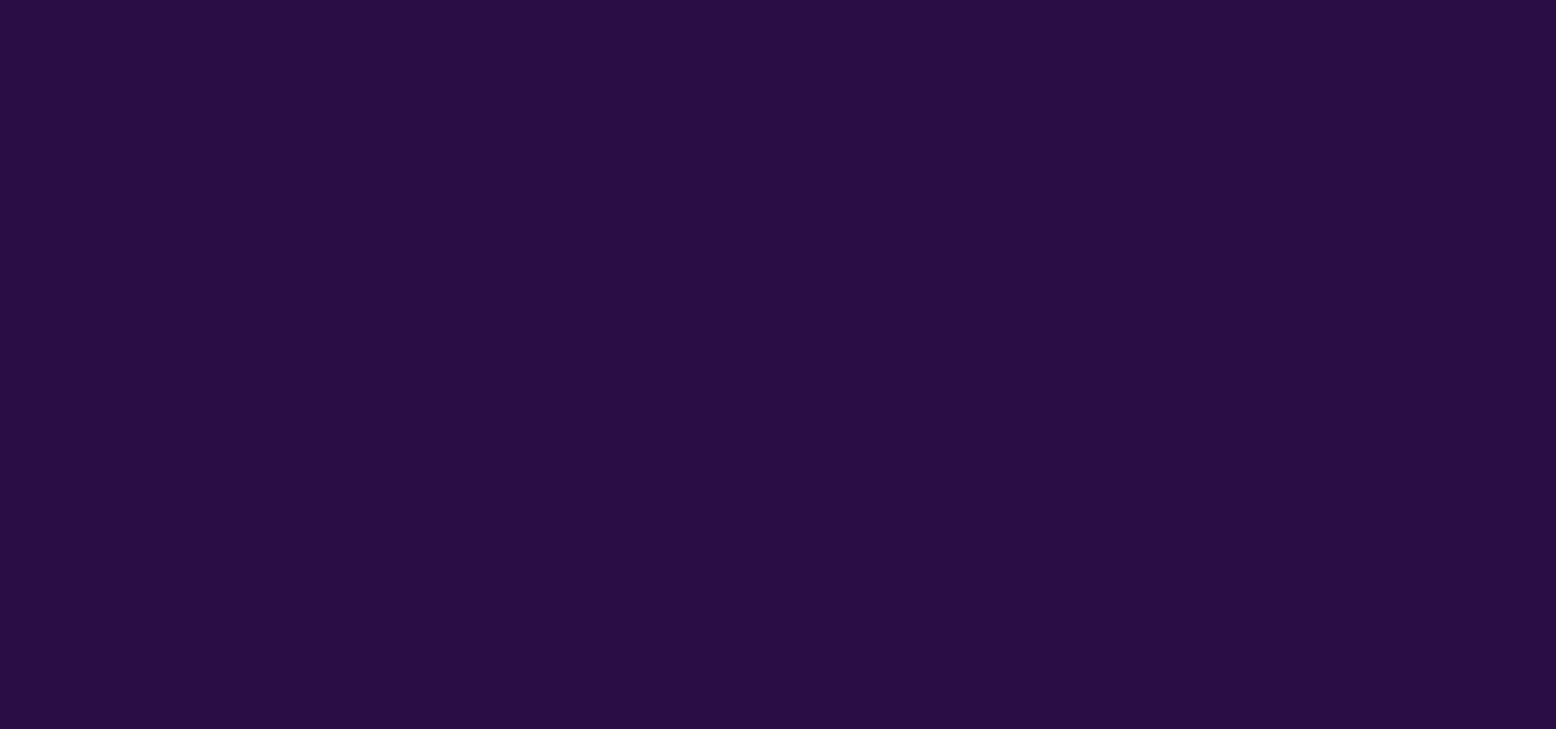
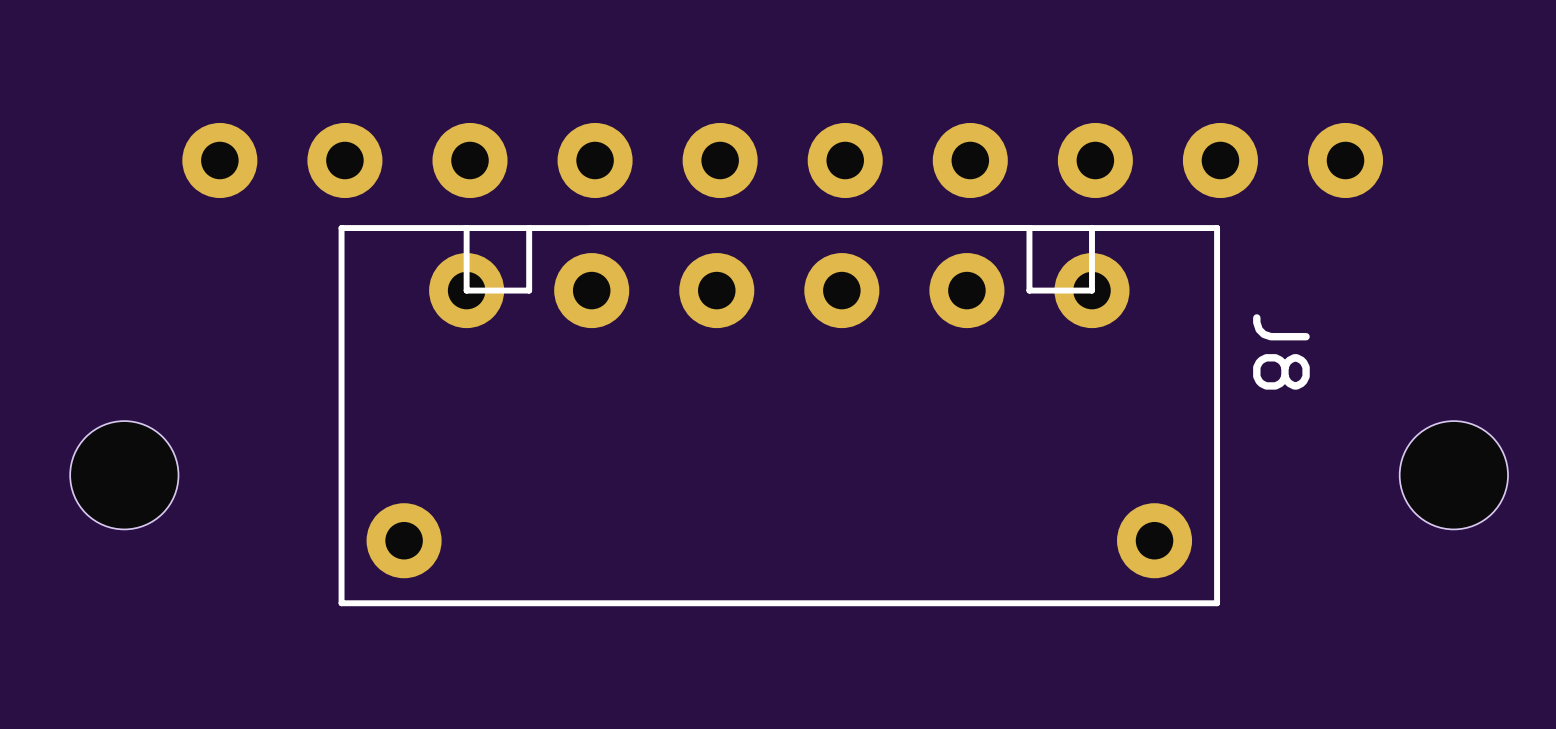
part: none -> (782, 160)
J8: none -> (779, 415)
part: none -> (124, 475)
part: none -> (1453, 475)

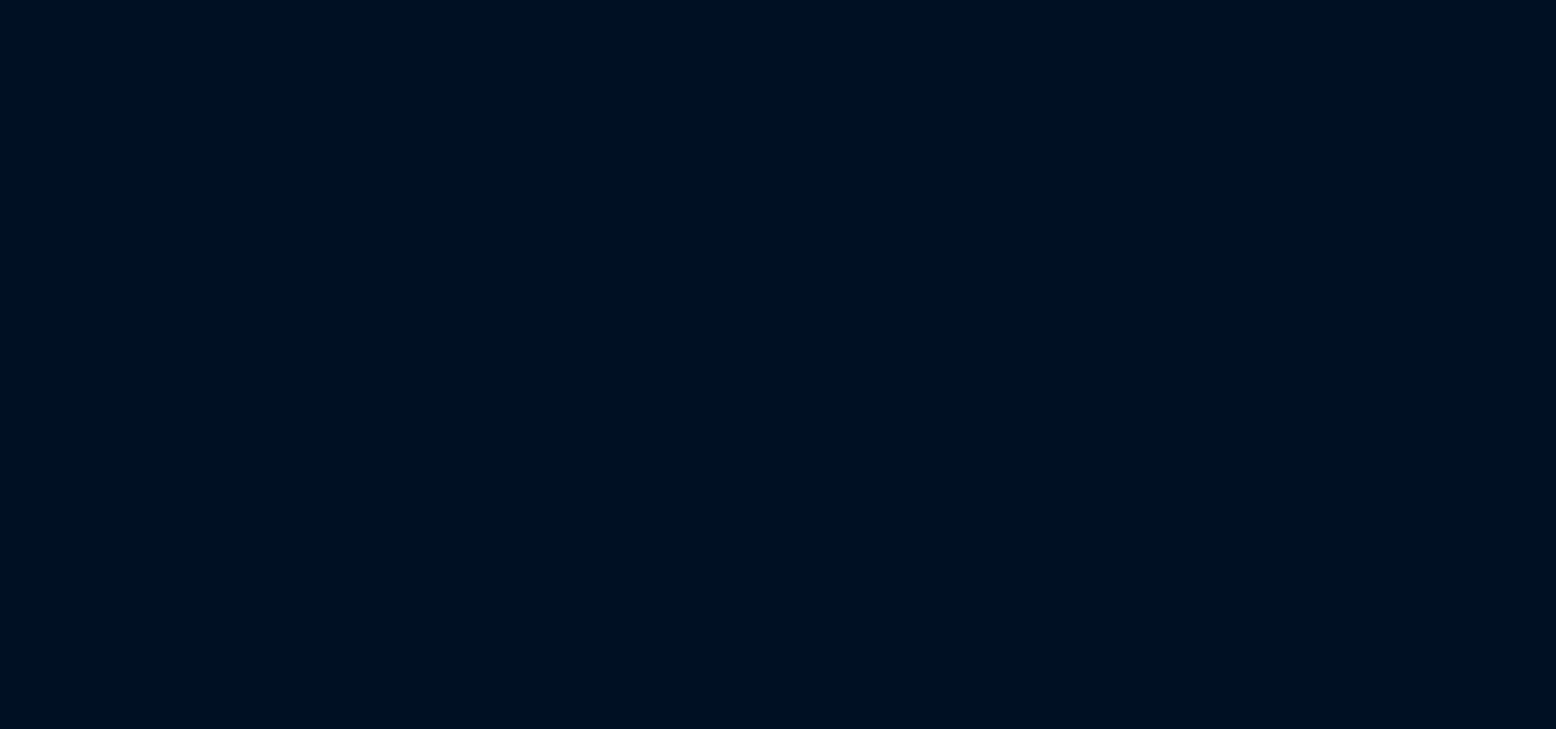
part: (782, 160) -> none
J8: (779, 415) -> none
part: (124, 475) -> none
part: (1453, 475) -> none

